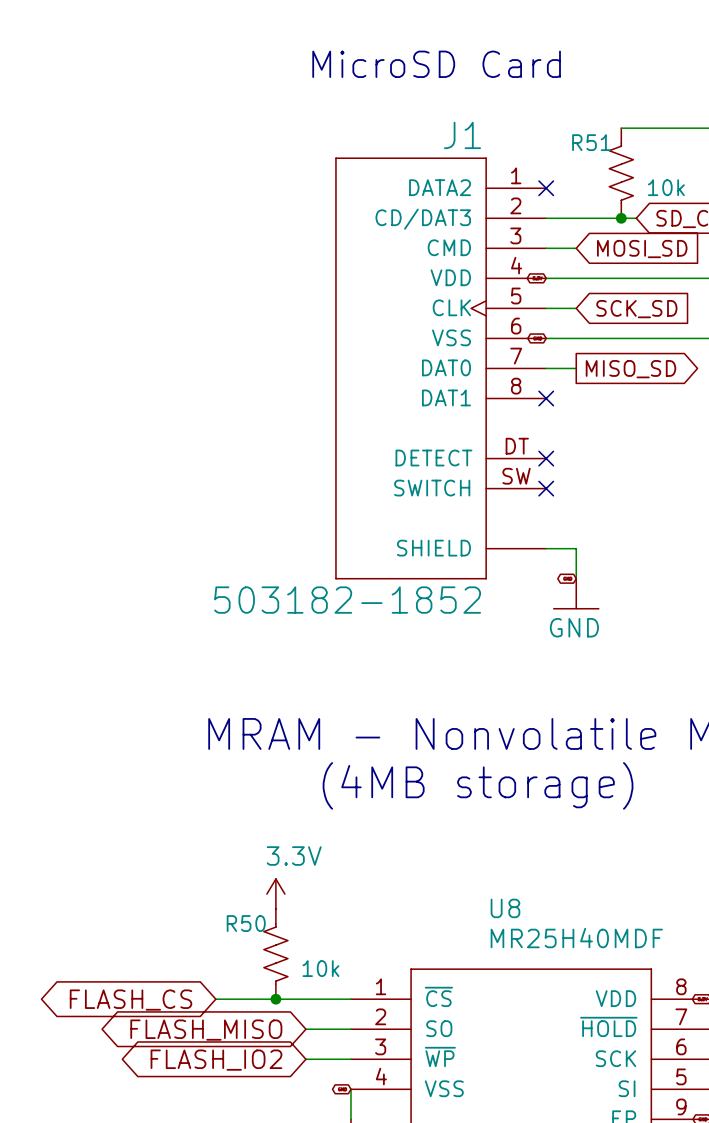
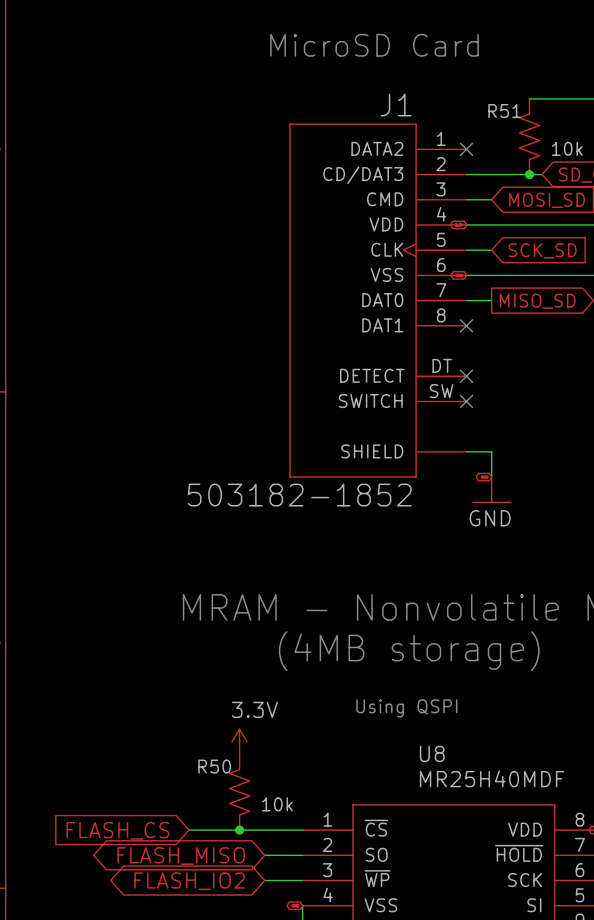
text: none -> Using QSPI (406, 708)
global label shape: bidirectional (131, 1000) -> input (117, 830)

